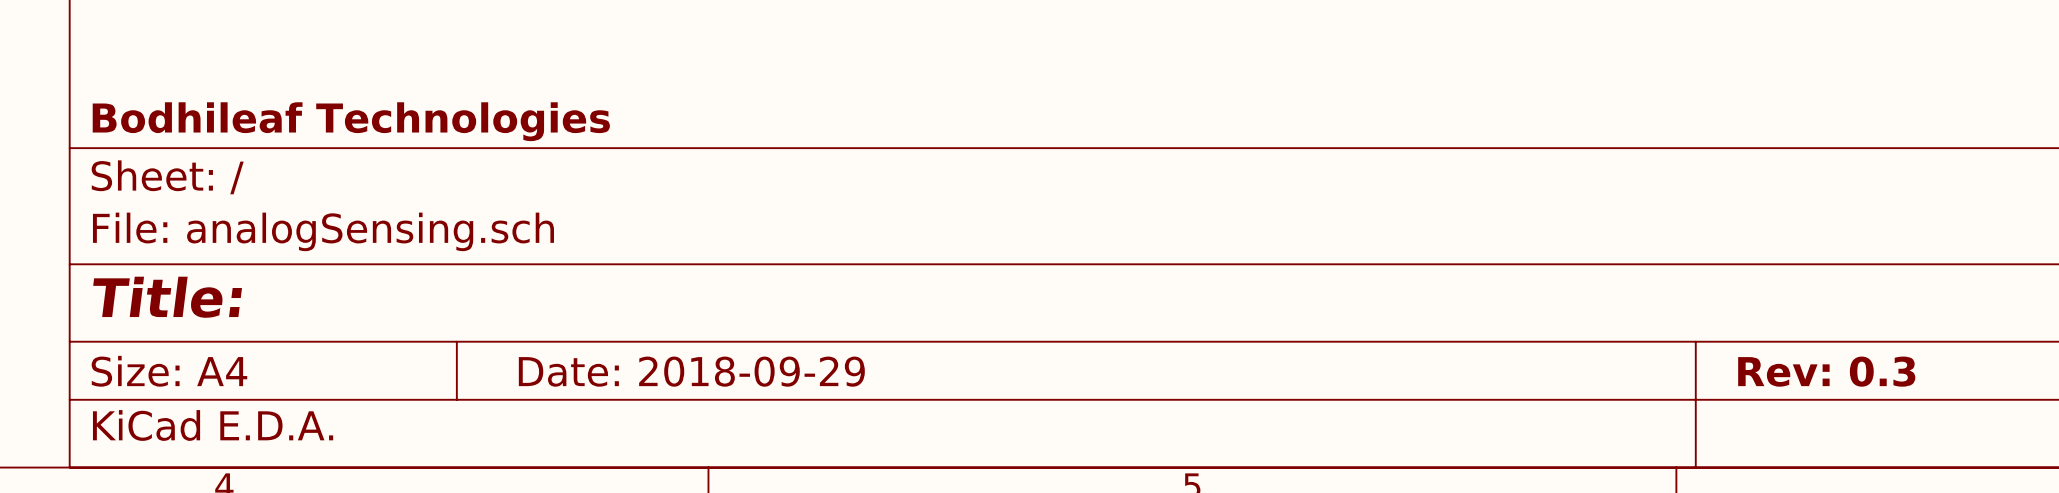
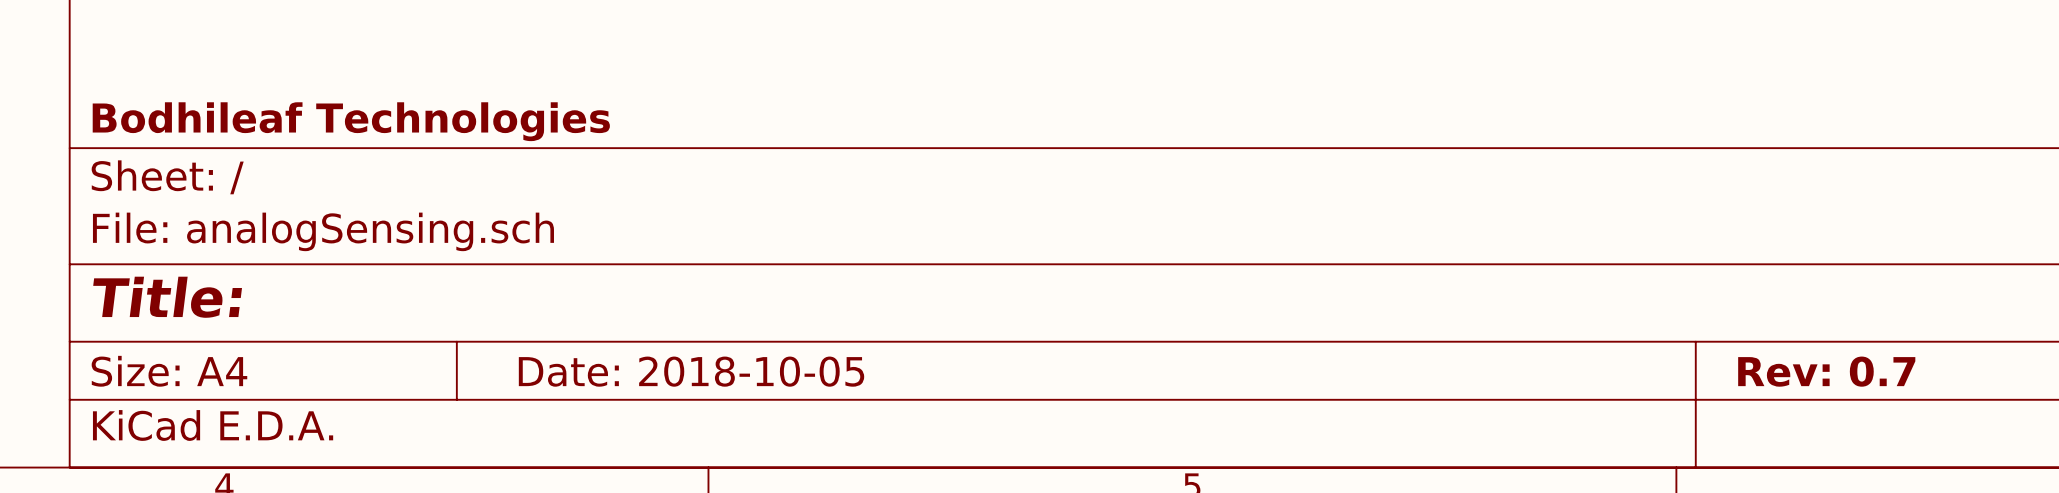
title block: Date: 2018-09-29 (691, 371) -> Date: 2018-10-05 (691, 371)
title block: Rev: 0.3 (1826, 371) -> Rev: 0.7 (1826, 371)

